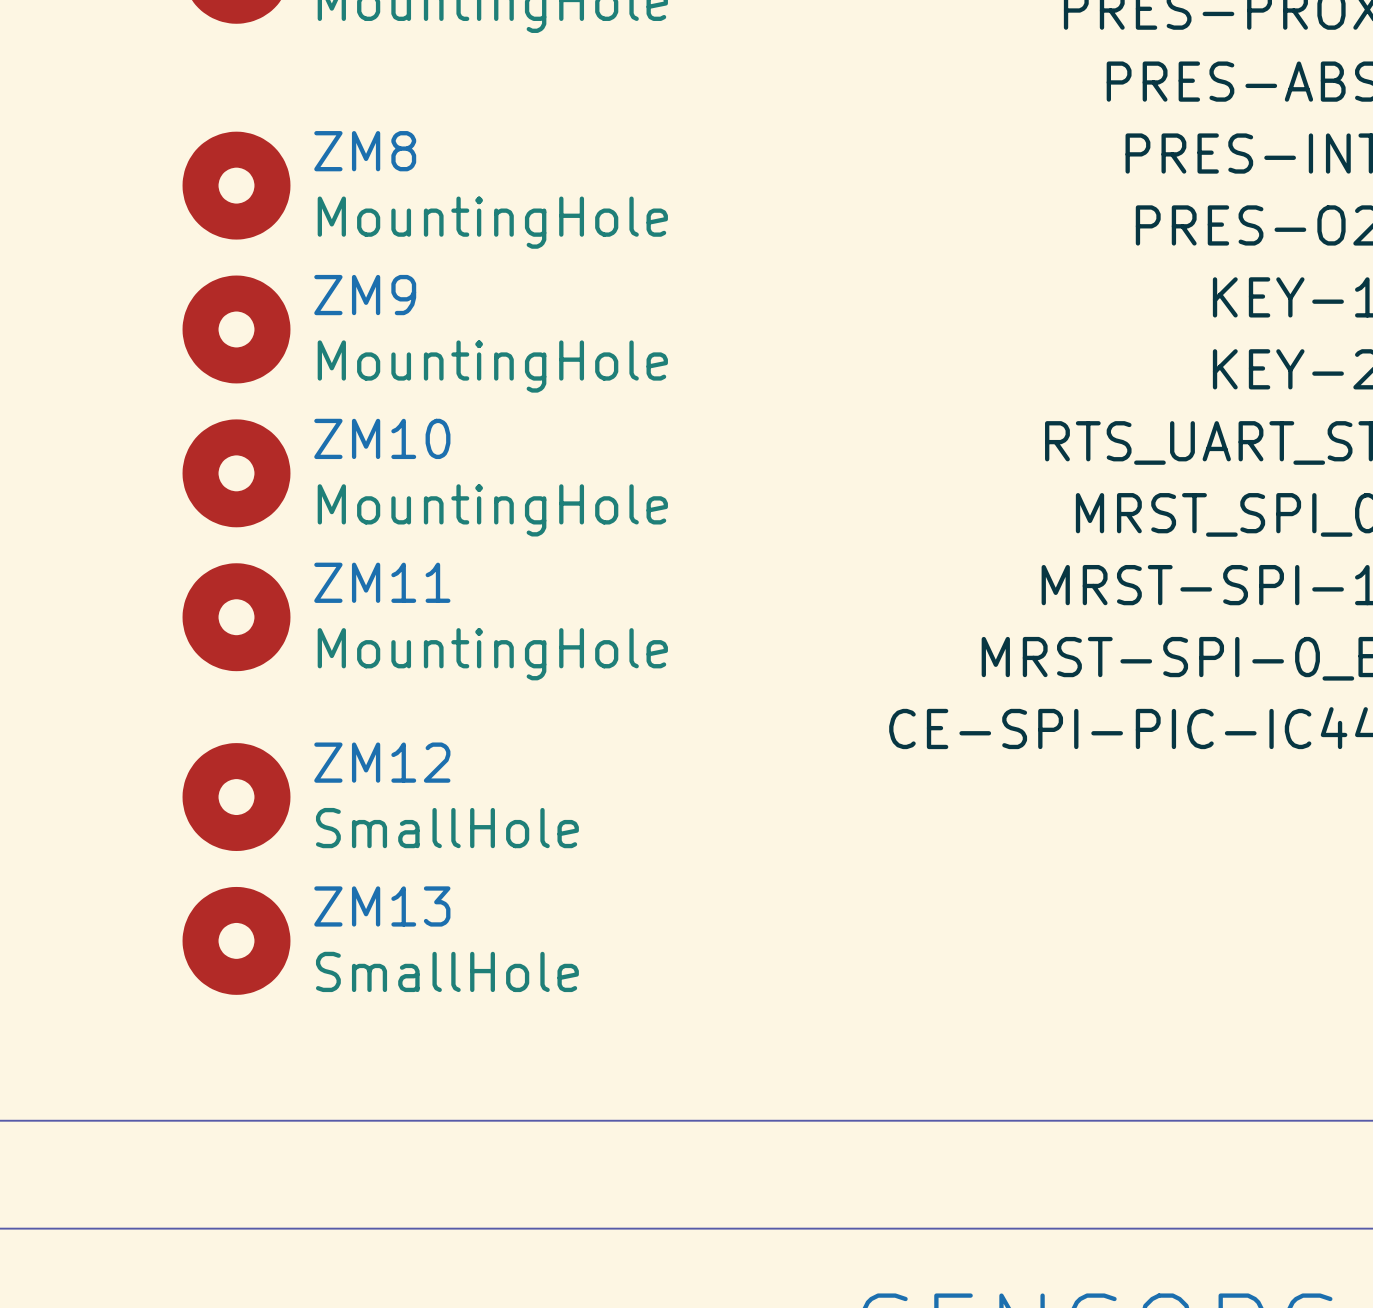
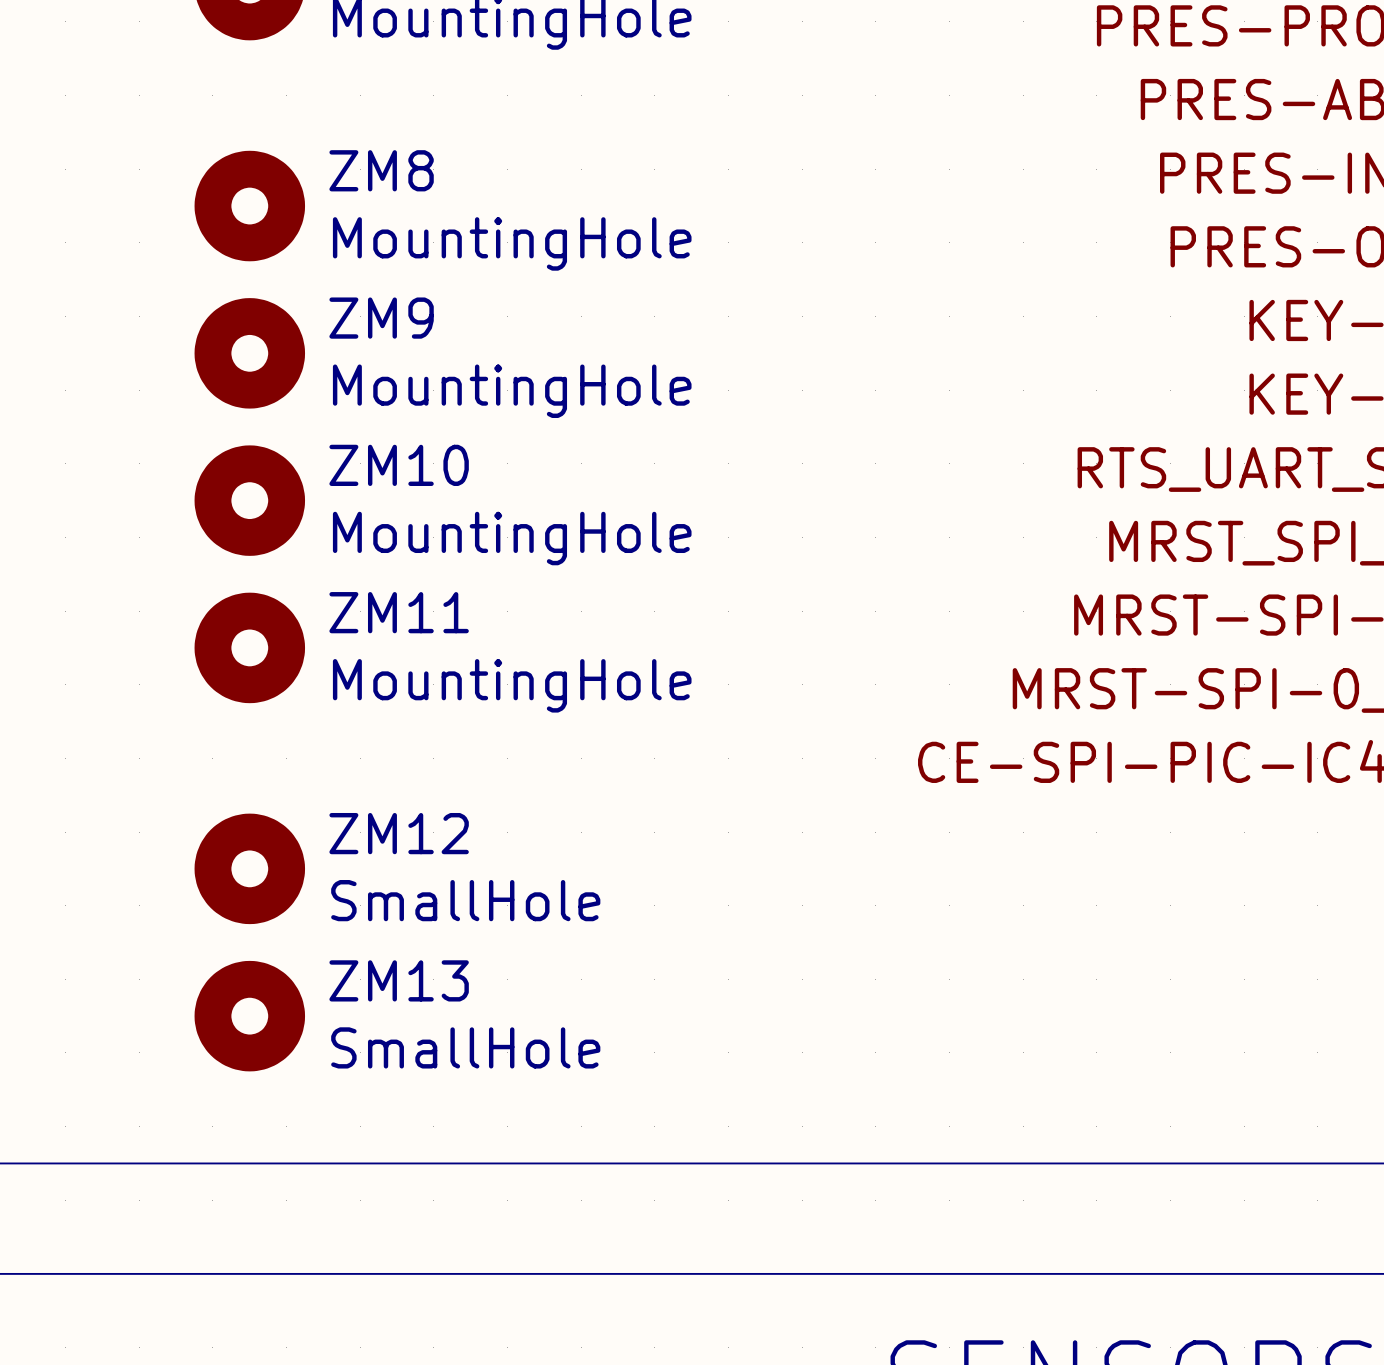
ZM12 position: (236, 797) -> (249, 868)
ZM13 position: (236, 940) -> (249, 1016)

